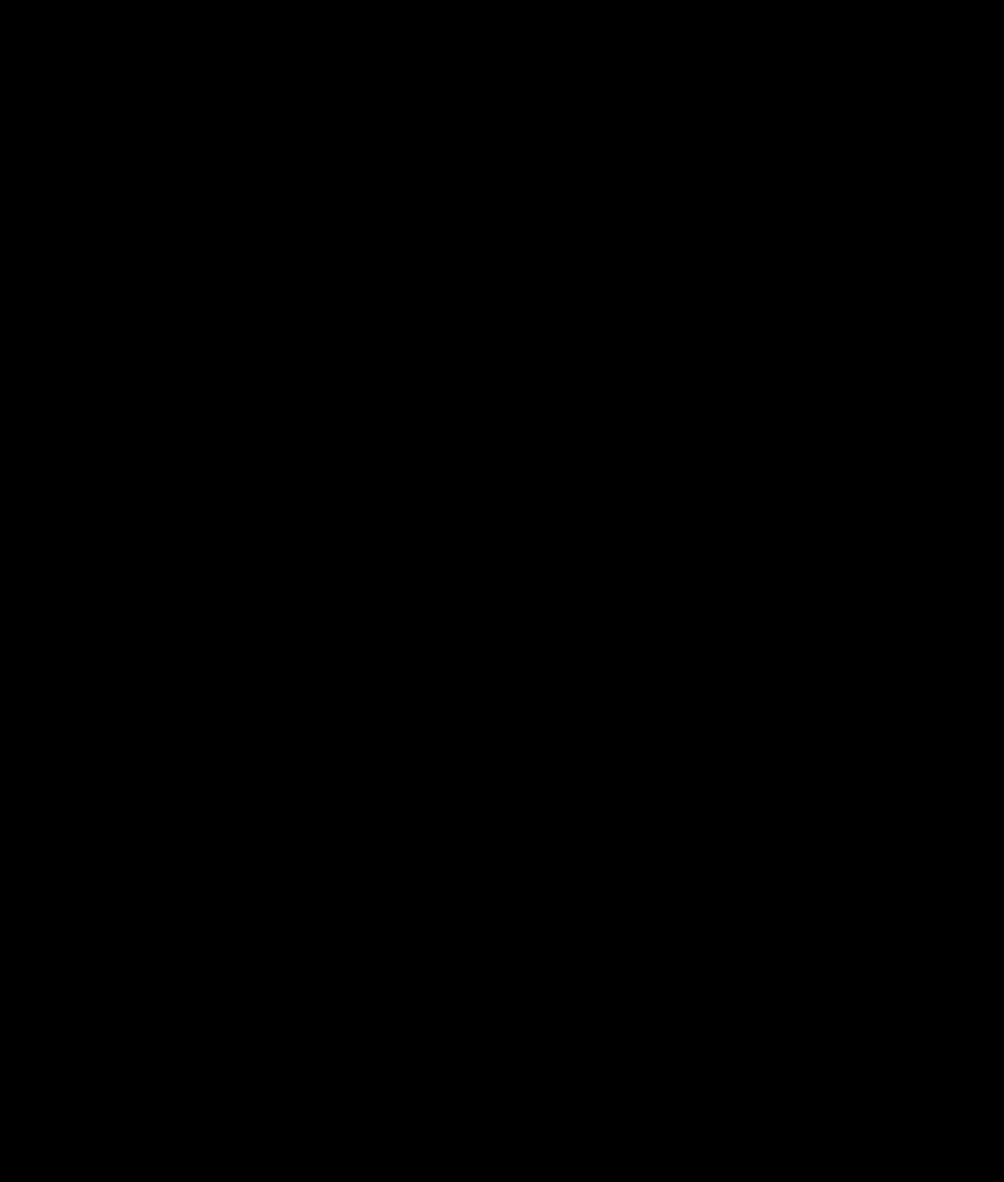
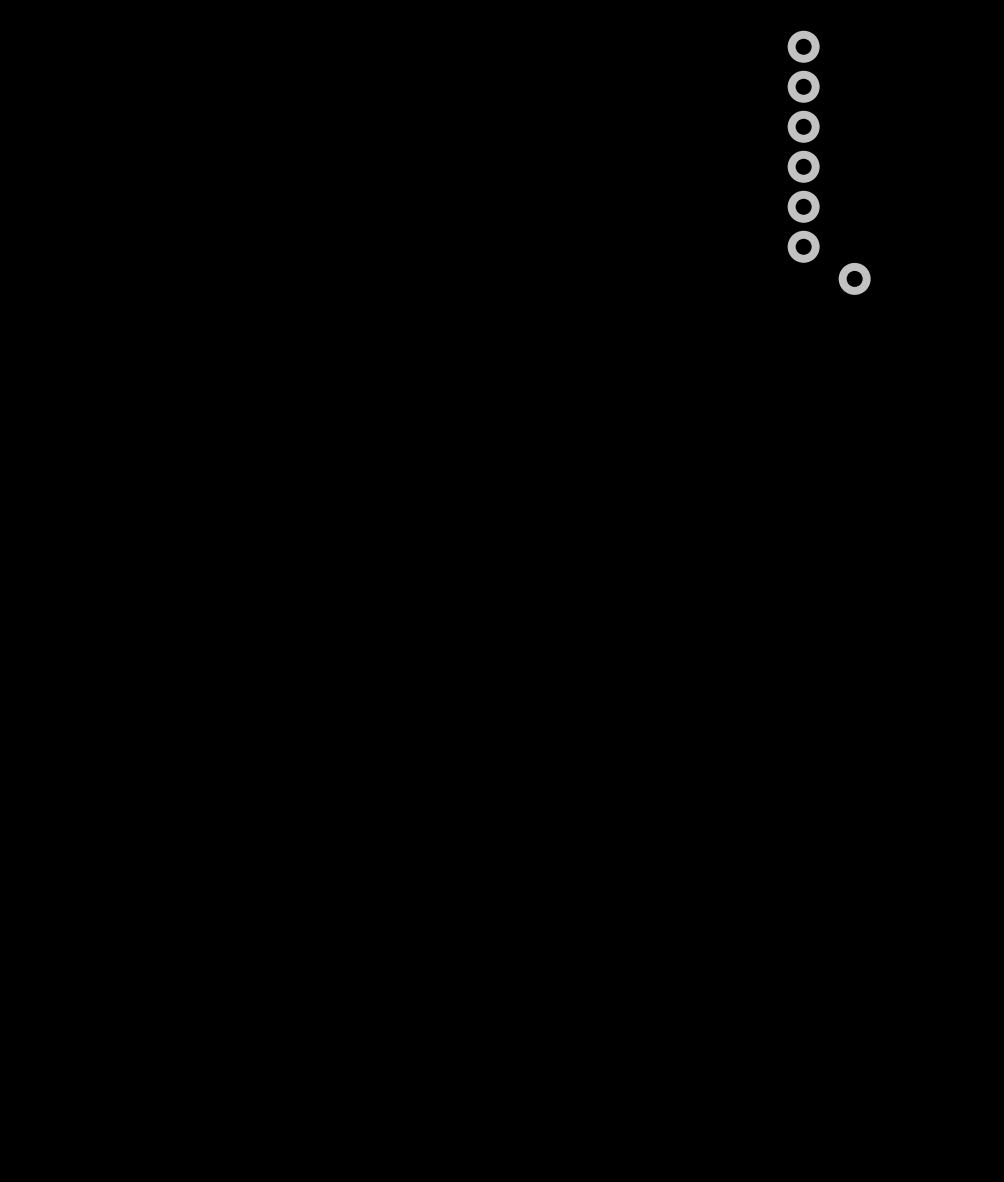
via: none -> (803, 46)
via: none -> (803, 86)
via: none -> (803, 126)
via: none -> (803, 166)
via: none -> (803, 206)
via: none -> (803, 246)
via: none -> (854, 278)

